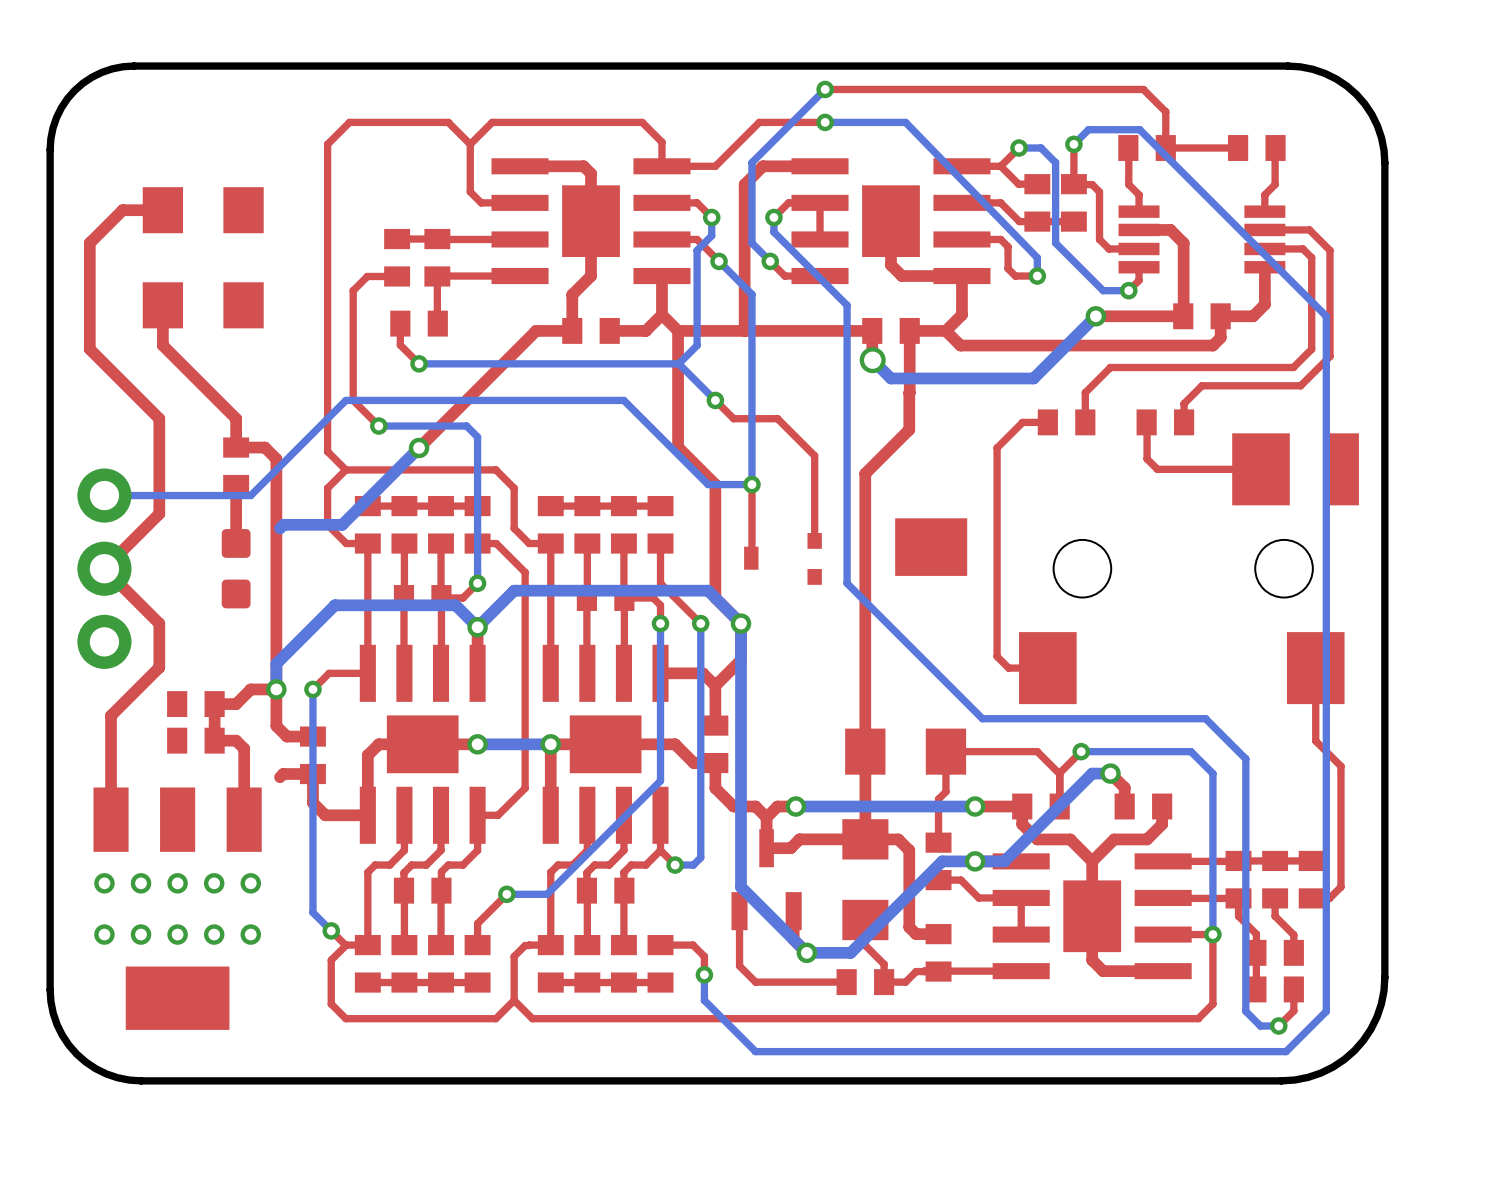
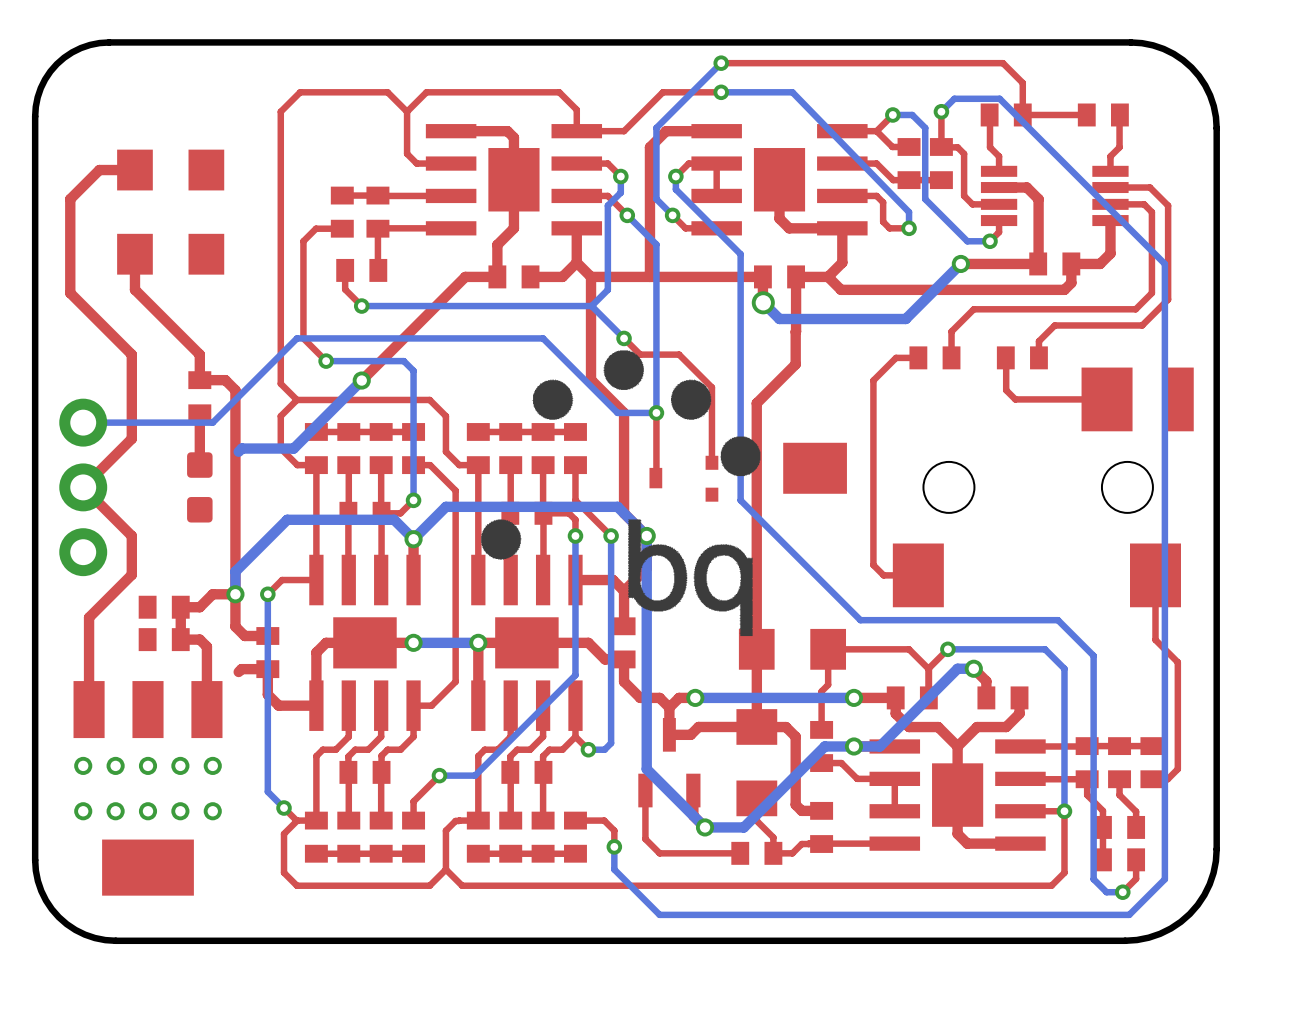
drawing: none -> [481, 350, 761, 637]

